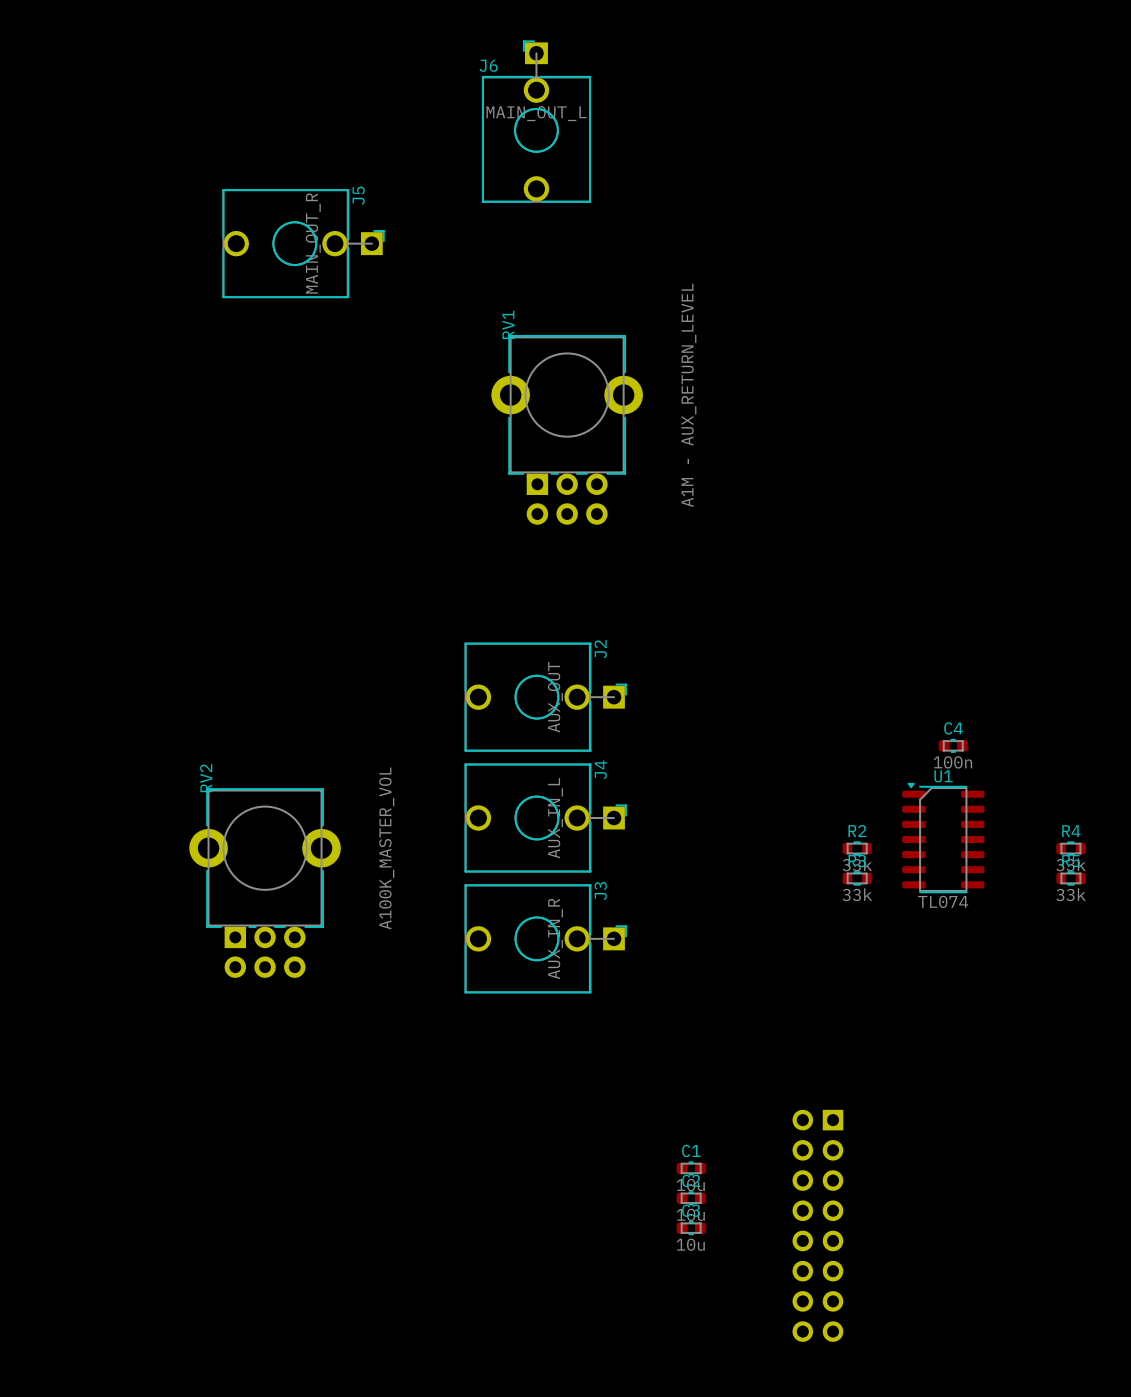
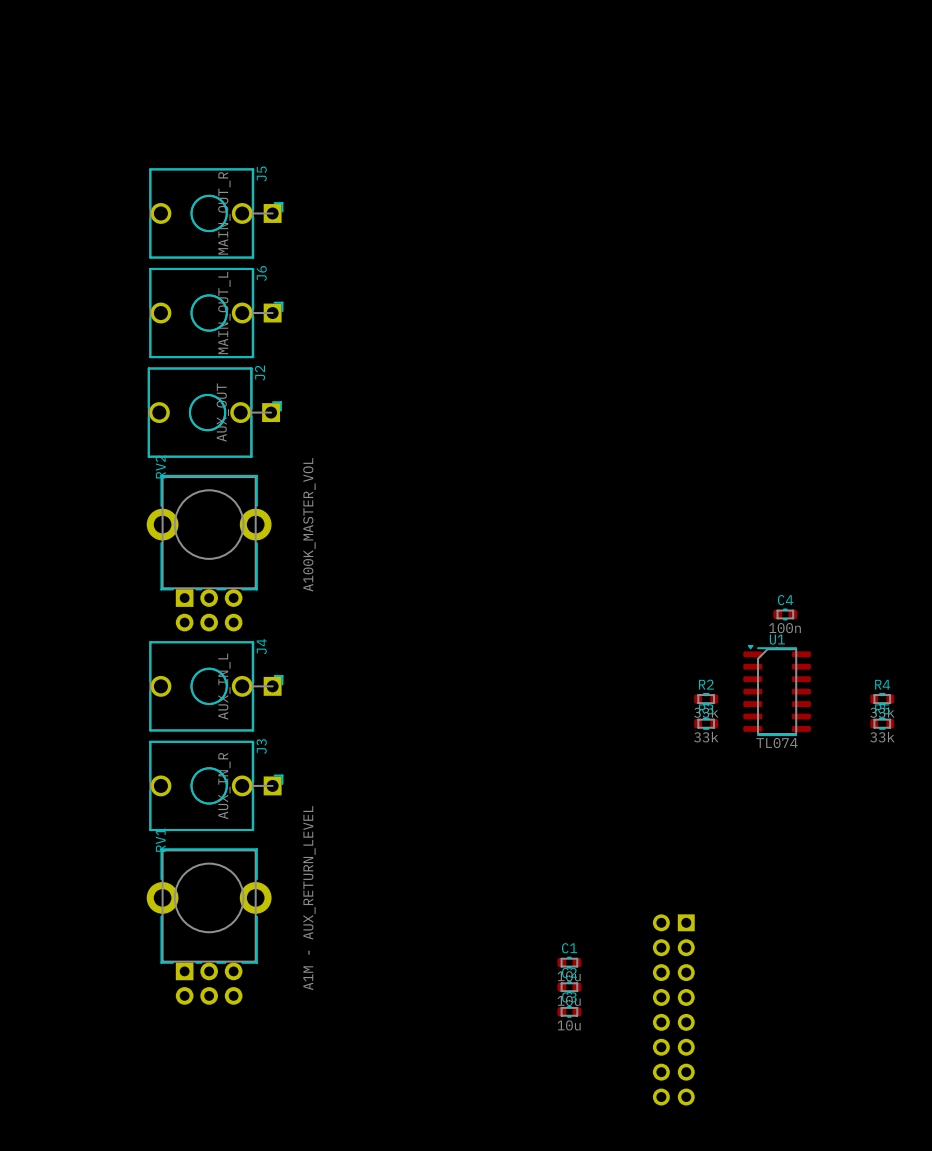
J6 rotation: 0° (536, 121) -> 90° clockwise (216, 313)
J6 position: (536, 121) -> (216, 313)
J5 position: (303, 243) -> (216, 213)
RV1 position: (567, 429) -> (209, 926)
J2 position: (545, 697) -> (214, 412)
J4 position: (545, 818) -> (216, 686)
RV2 position: (265, 883) -> (209, 553)
J3 position: (545, 938) -> (216, 785)

